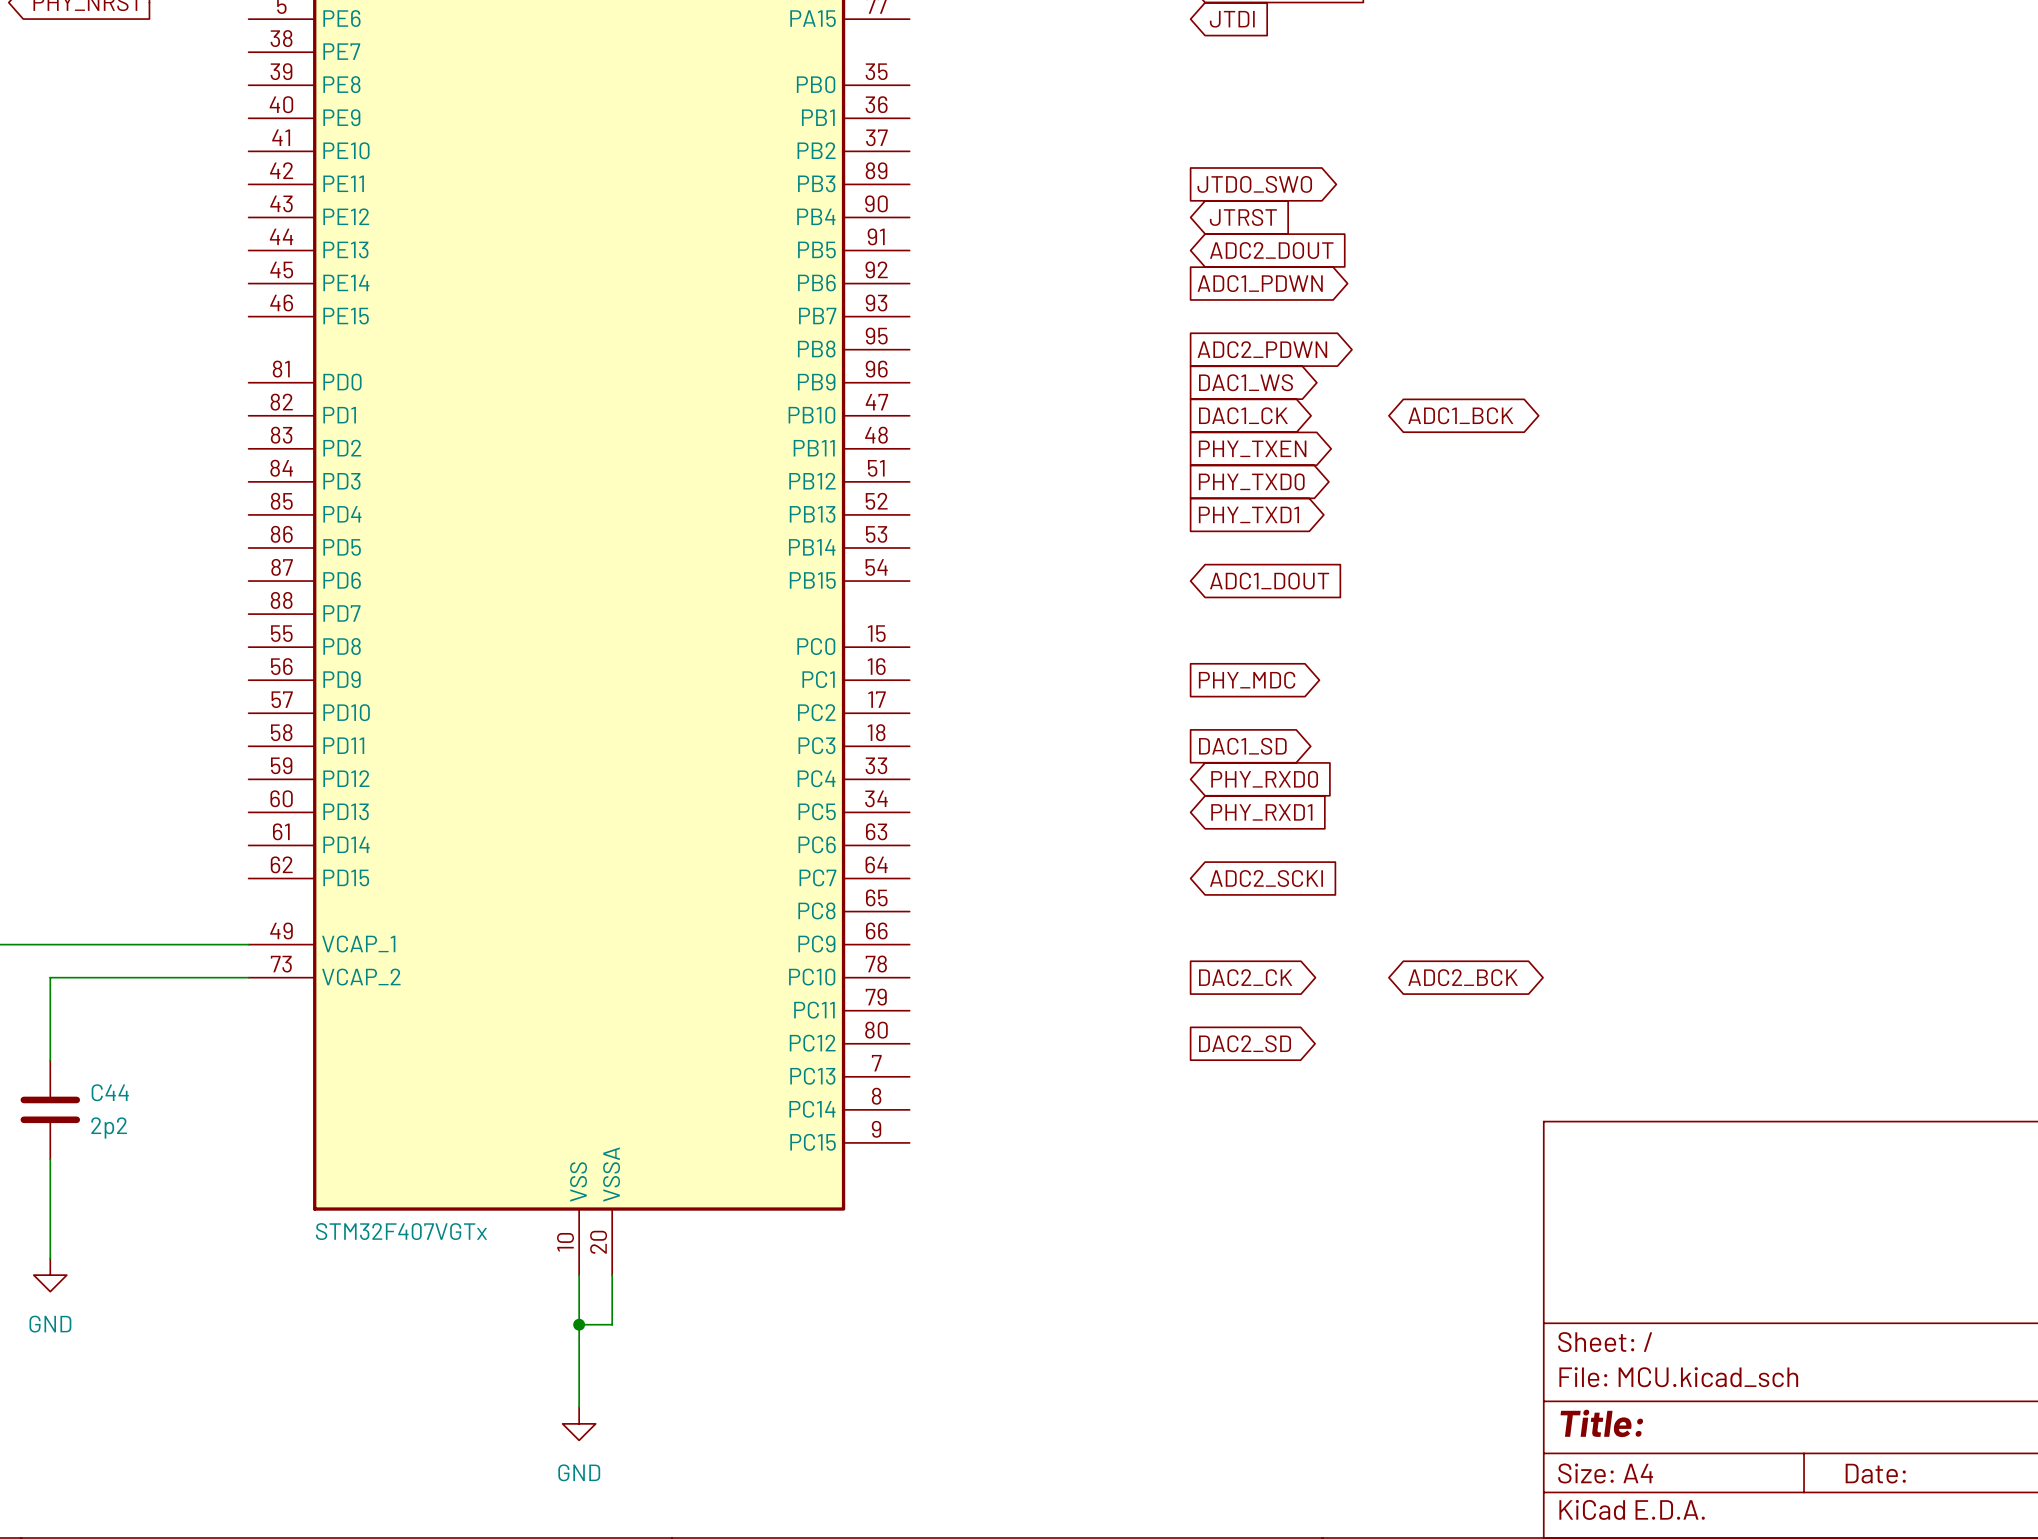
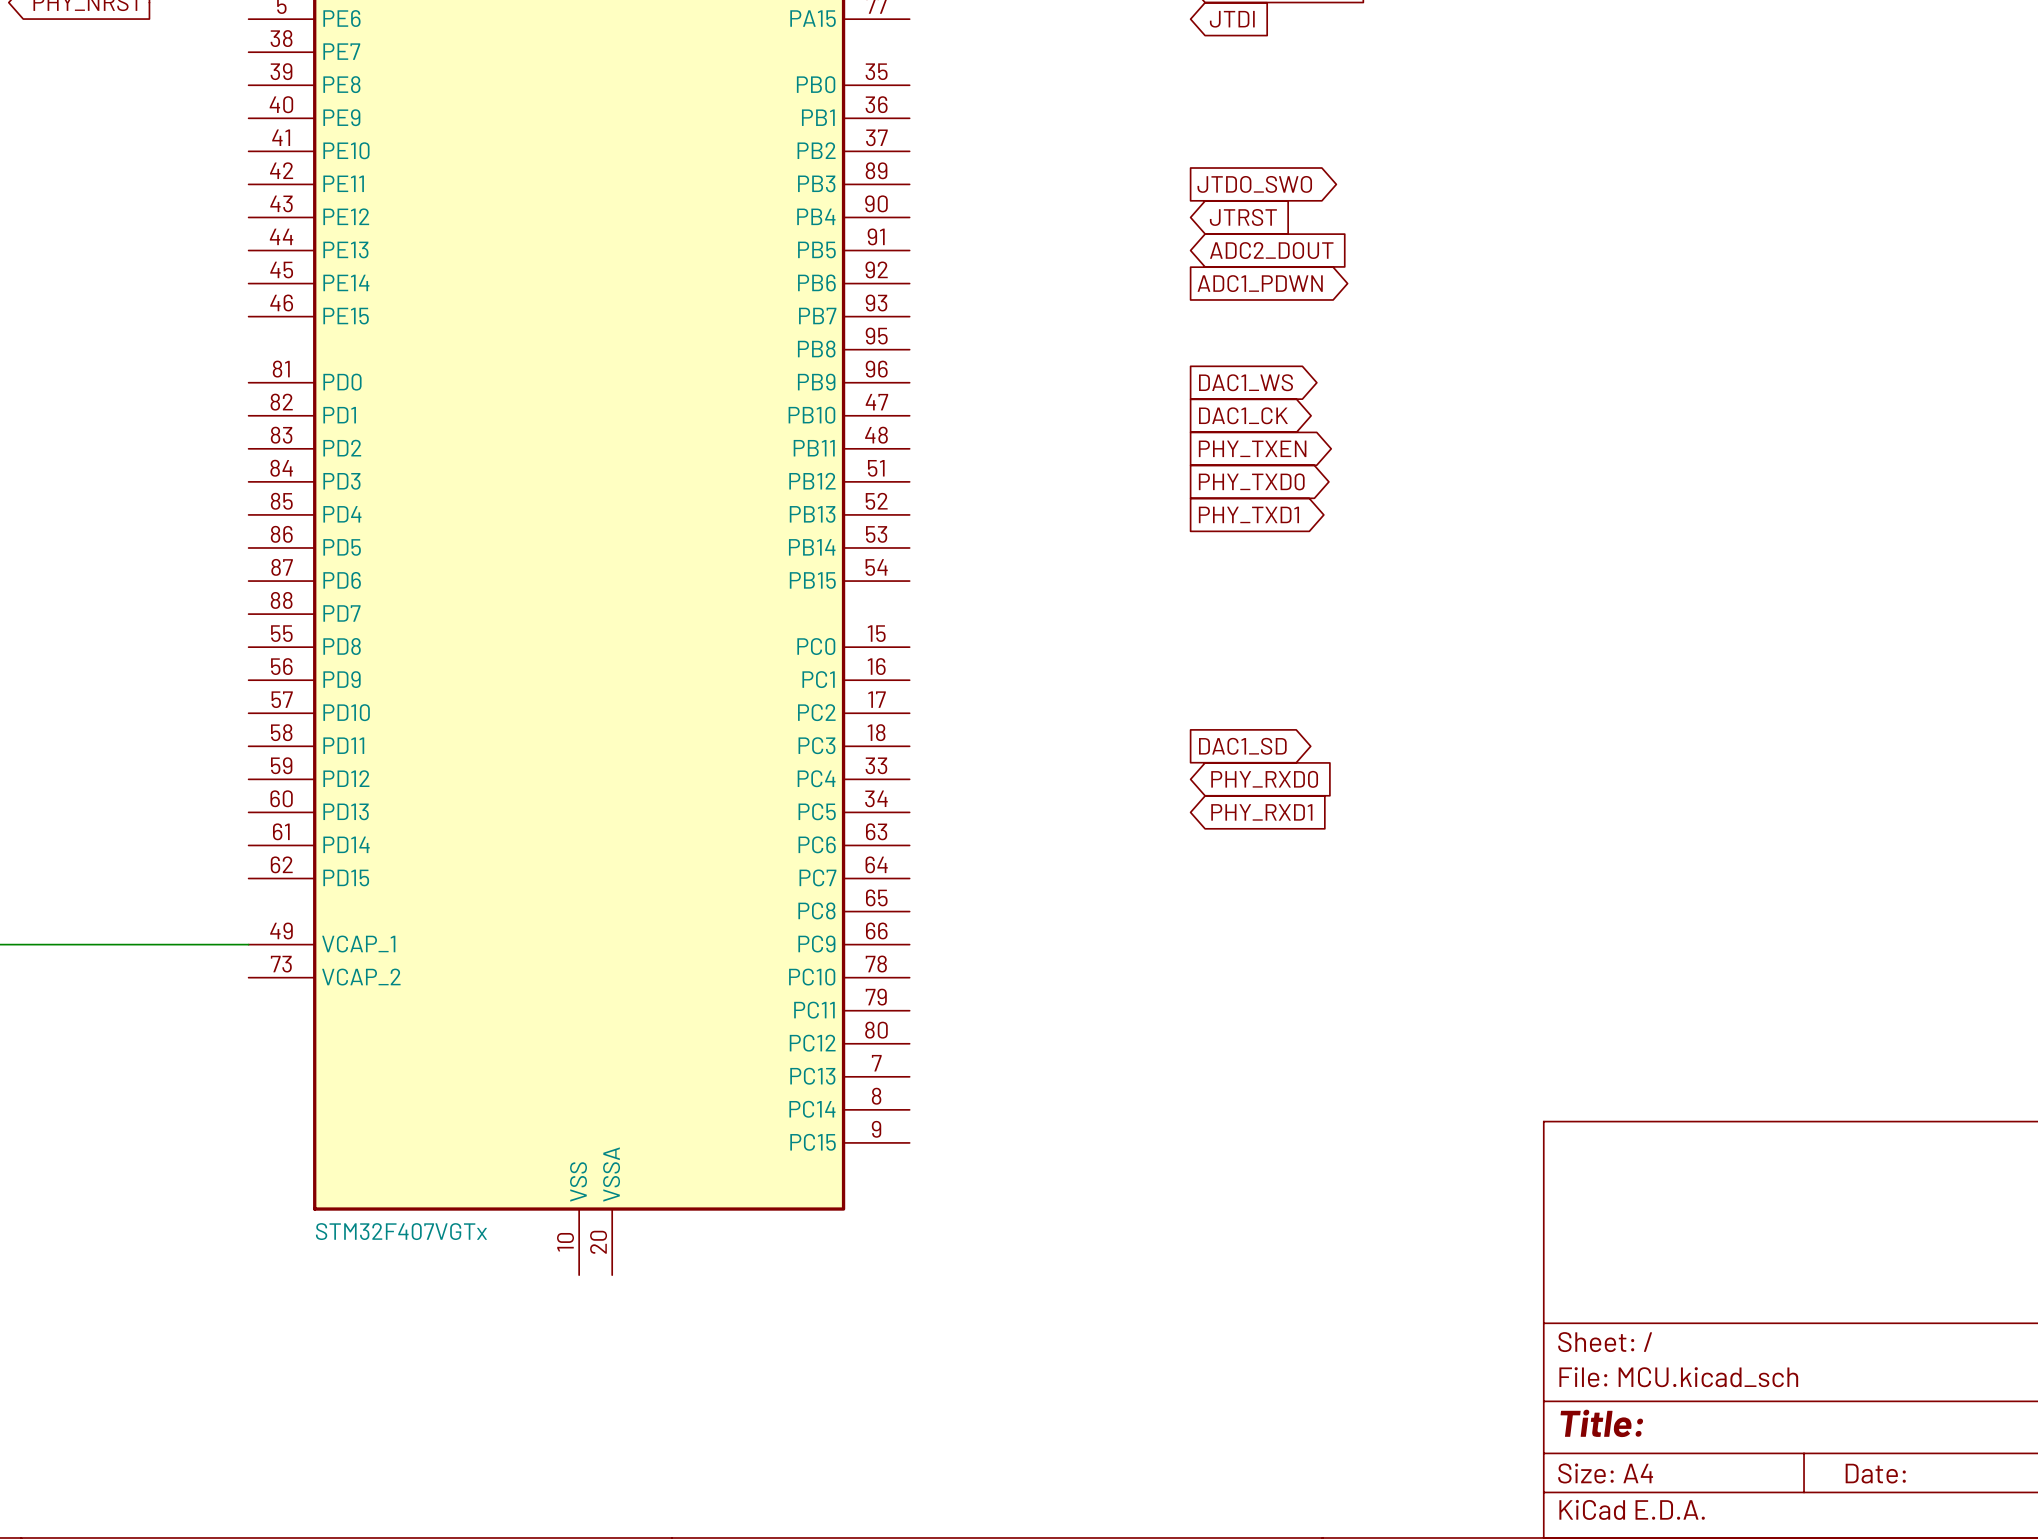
global label: ADC2_PDWN (1262, 349) -> none
global label: ADC1_BCK (1460, 415) -> none
global label: ADC1_DOUT (1269, 581) -> none
global label: PHY_MDC (1247, 680) -> none
global label: ADC2_SCKI (1266, 878) -> none
wire: (248, 977) (50, 977) (50, 1060) -> none
global label: DAC2_CK (1245, 977) -> none
global label: ADC2_BCK (1463, 977) -> none
global label: DAC2_SD (1245, 1043) -> none
C44: 2p2 (50, 1109) -> none
wire: (50, 1159) (50, 1258) -> none
power symbol: GND (50, 1275) -> none
wire: (579, 1275) (579, 1407) -> none
wire: (612, 1275) (612, 1324) (579, 1324) -> none
junction: (579, 1324) -> none
power symbol: GND (579, 1423) -> none

